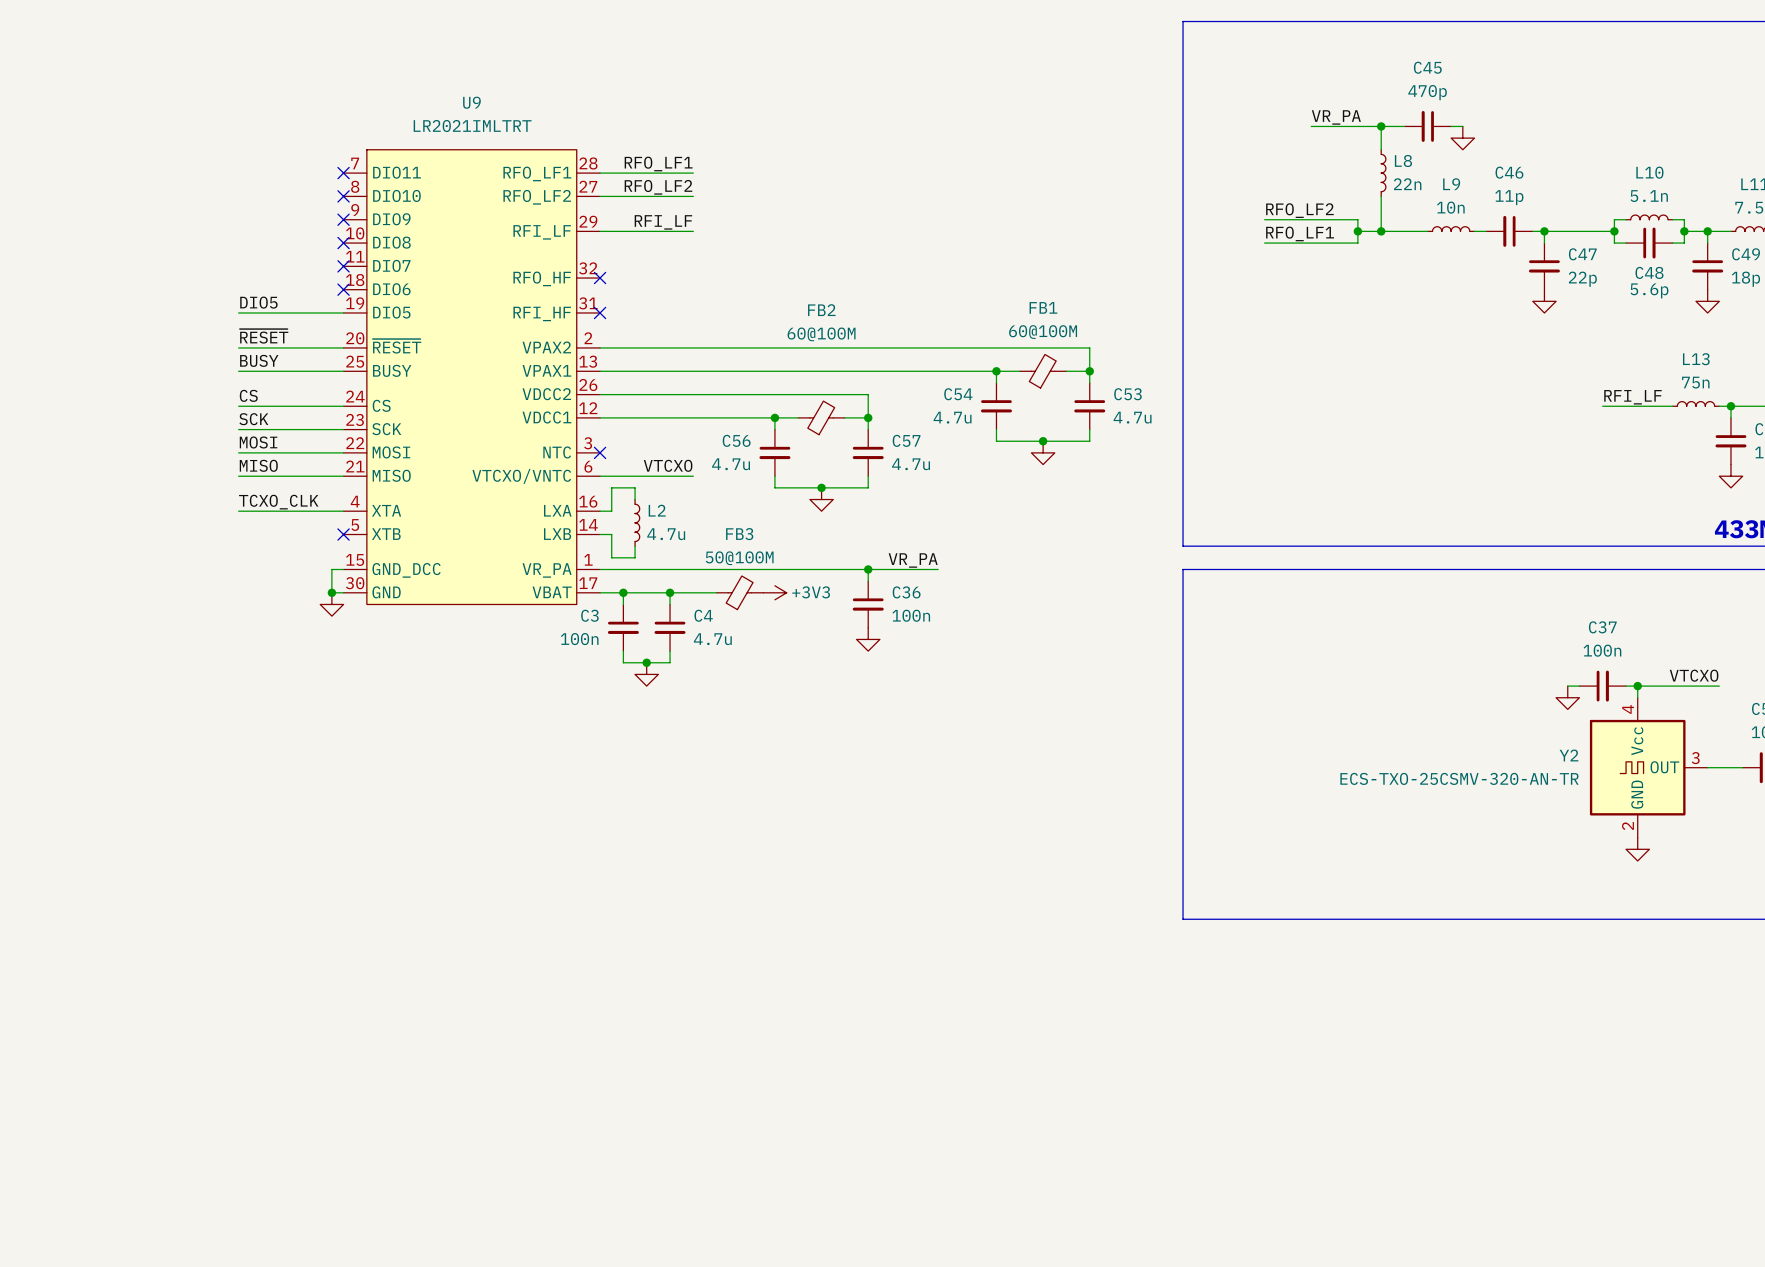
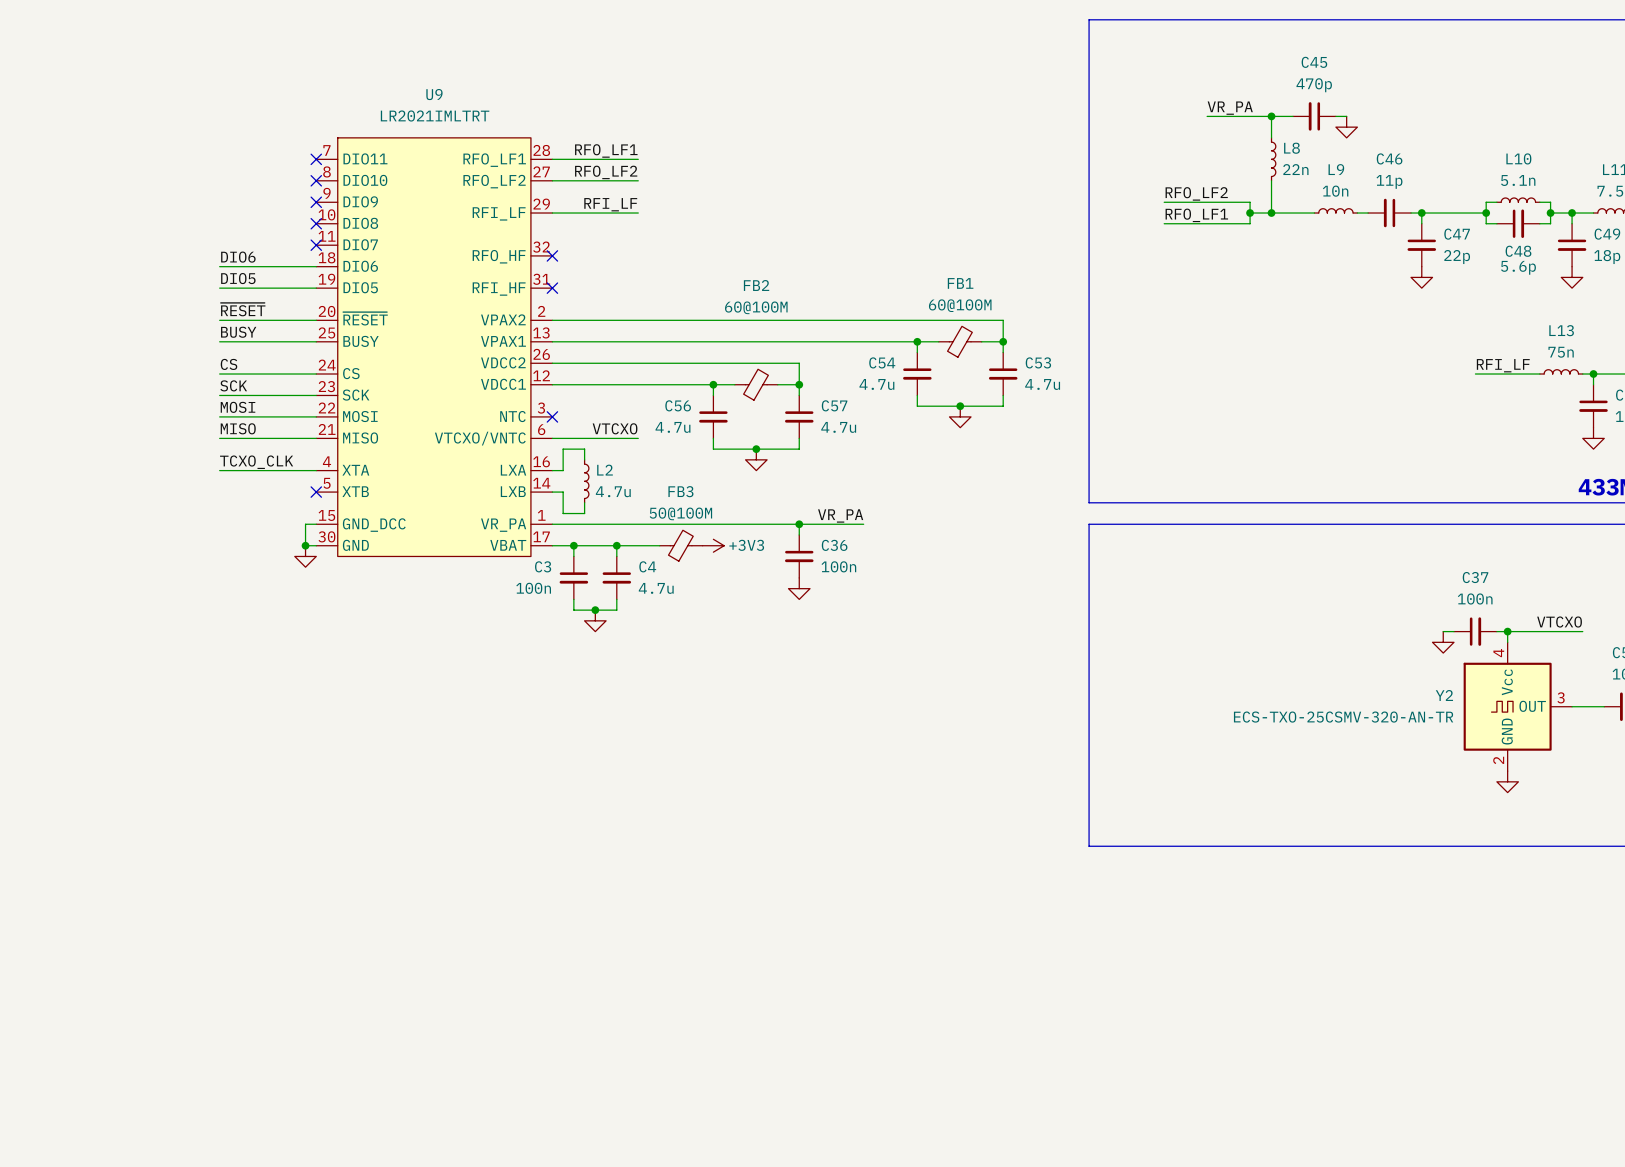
label: none -> DIO6 (238, 257)
wire: none -> (219, 266) (316, 266)
no-connect mark: (343, 289) -> none

